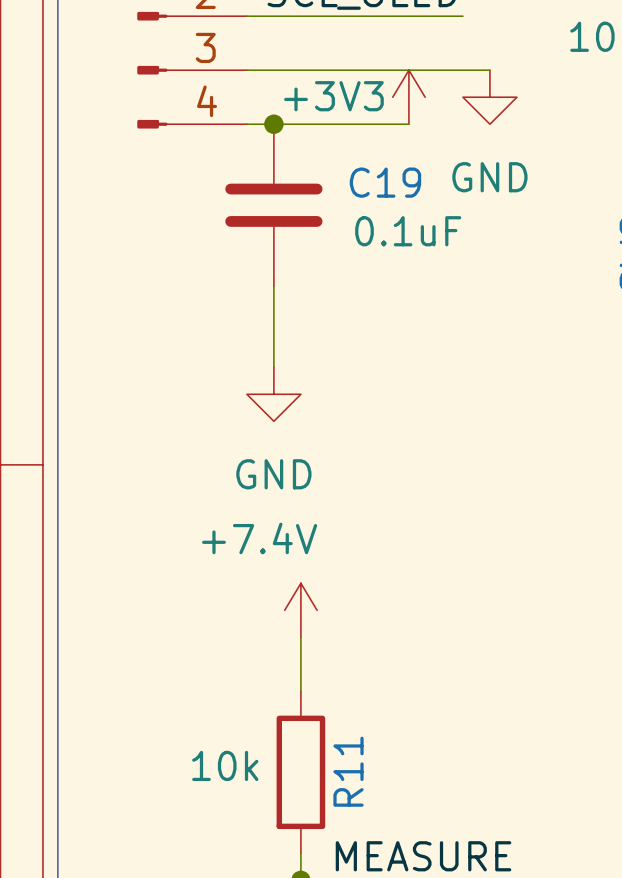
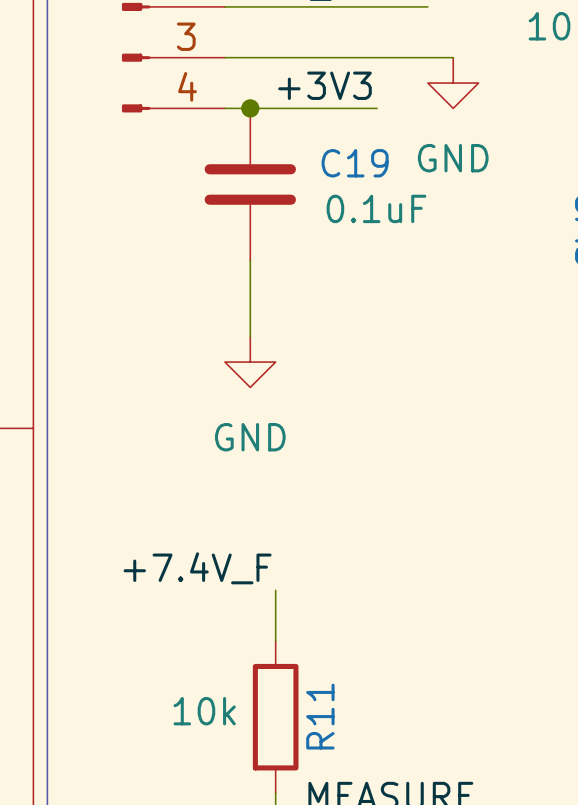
power symbol: +3V3 (408, 97) -> none
label: none -> +3V3 (325, 85)
power symbol: +7.4V (300, 610) -> none
label: none -> +7.4V_F (197, 568)

